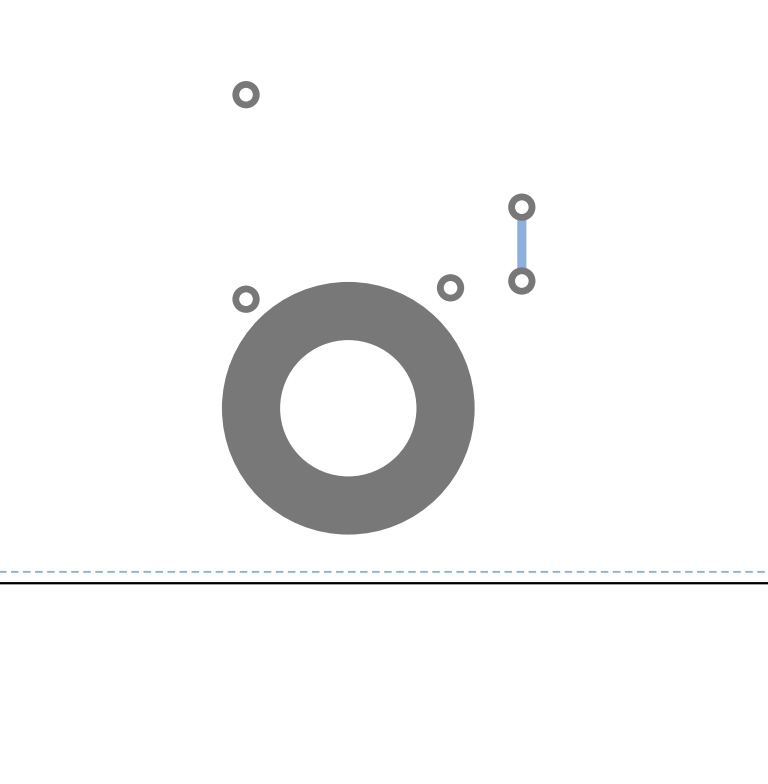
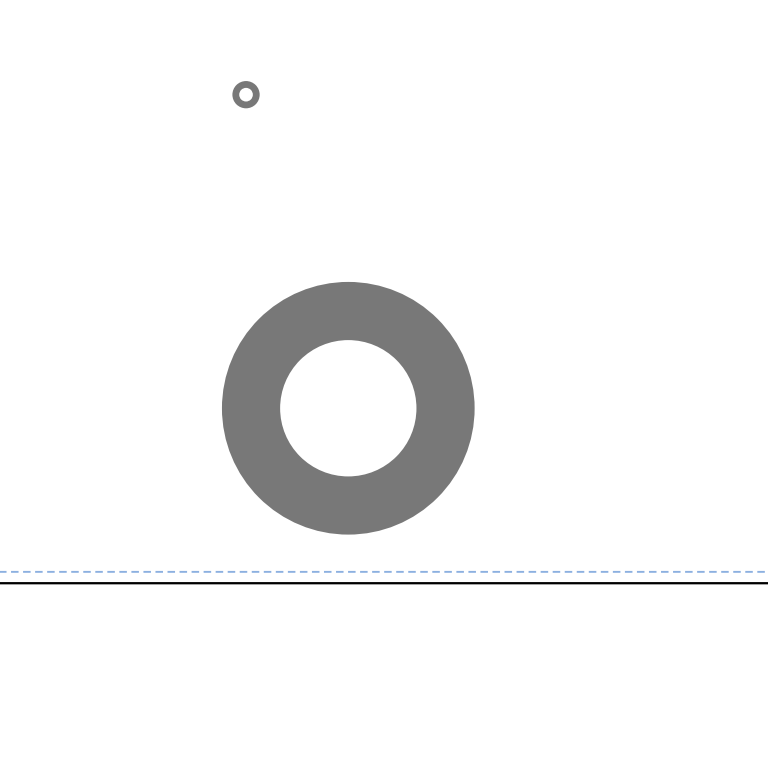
track: (521, 207) (521, 281) -> none
via: (521, 207) -> none
via: (521, 281) -> none
via: (450, 287) -> none
via: (246, 299) -> none

